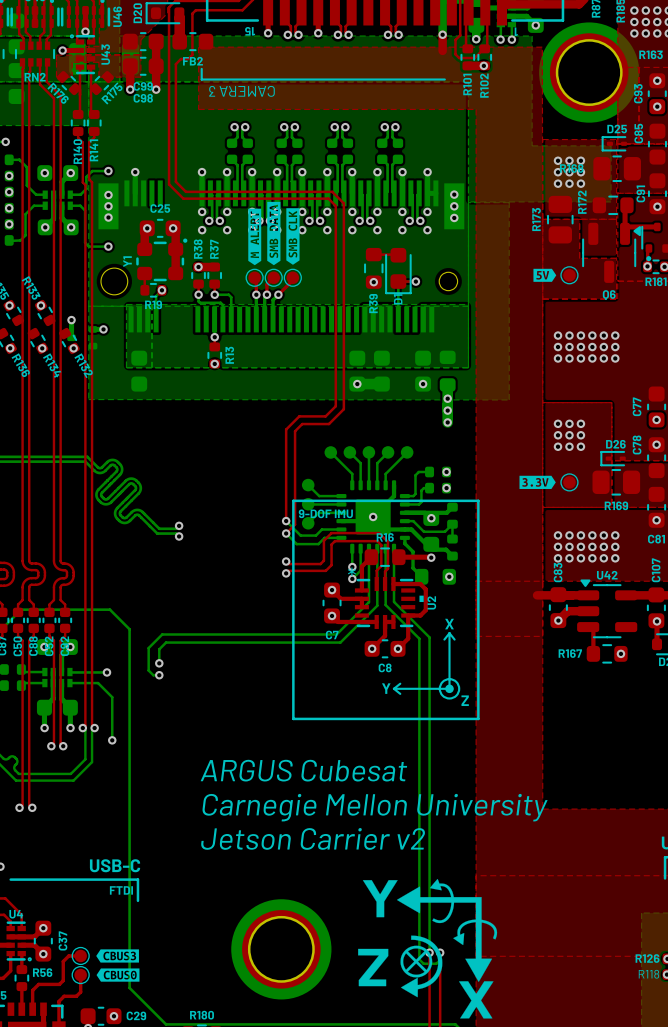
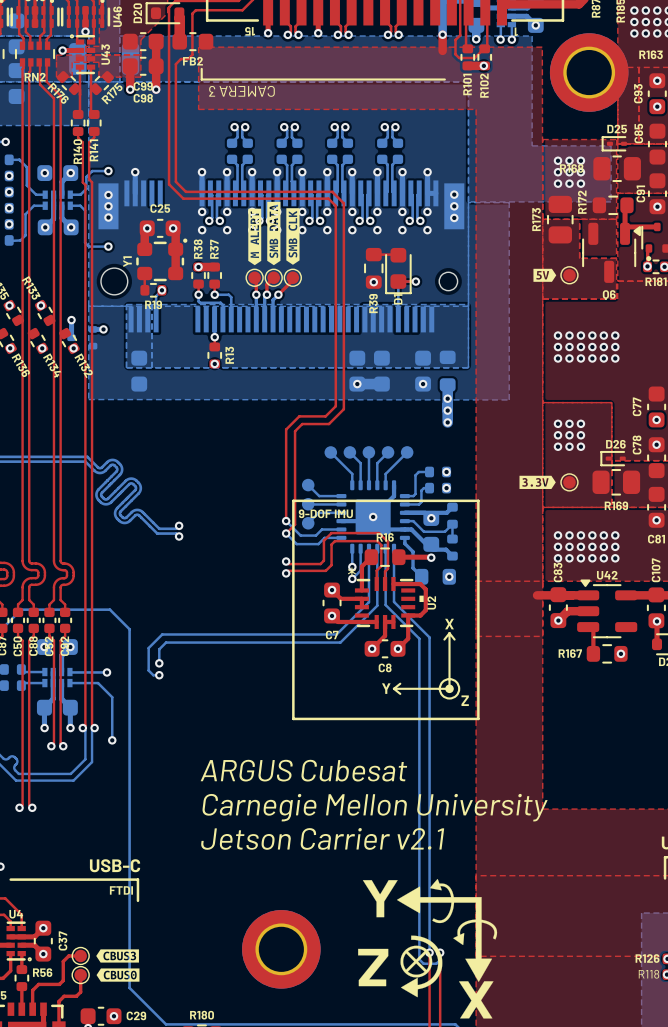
part footprint: [539, 22, 640, 123] -> [549, 33, 629, 112]
text: Jetson Carrier v2 (313, 838) -> Jetson Carrier v2.1 (322, 838)
part footprint: [231, 899, 332, 1000] -> [242, 910, 321, 989]

